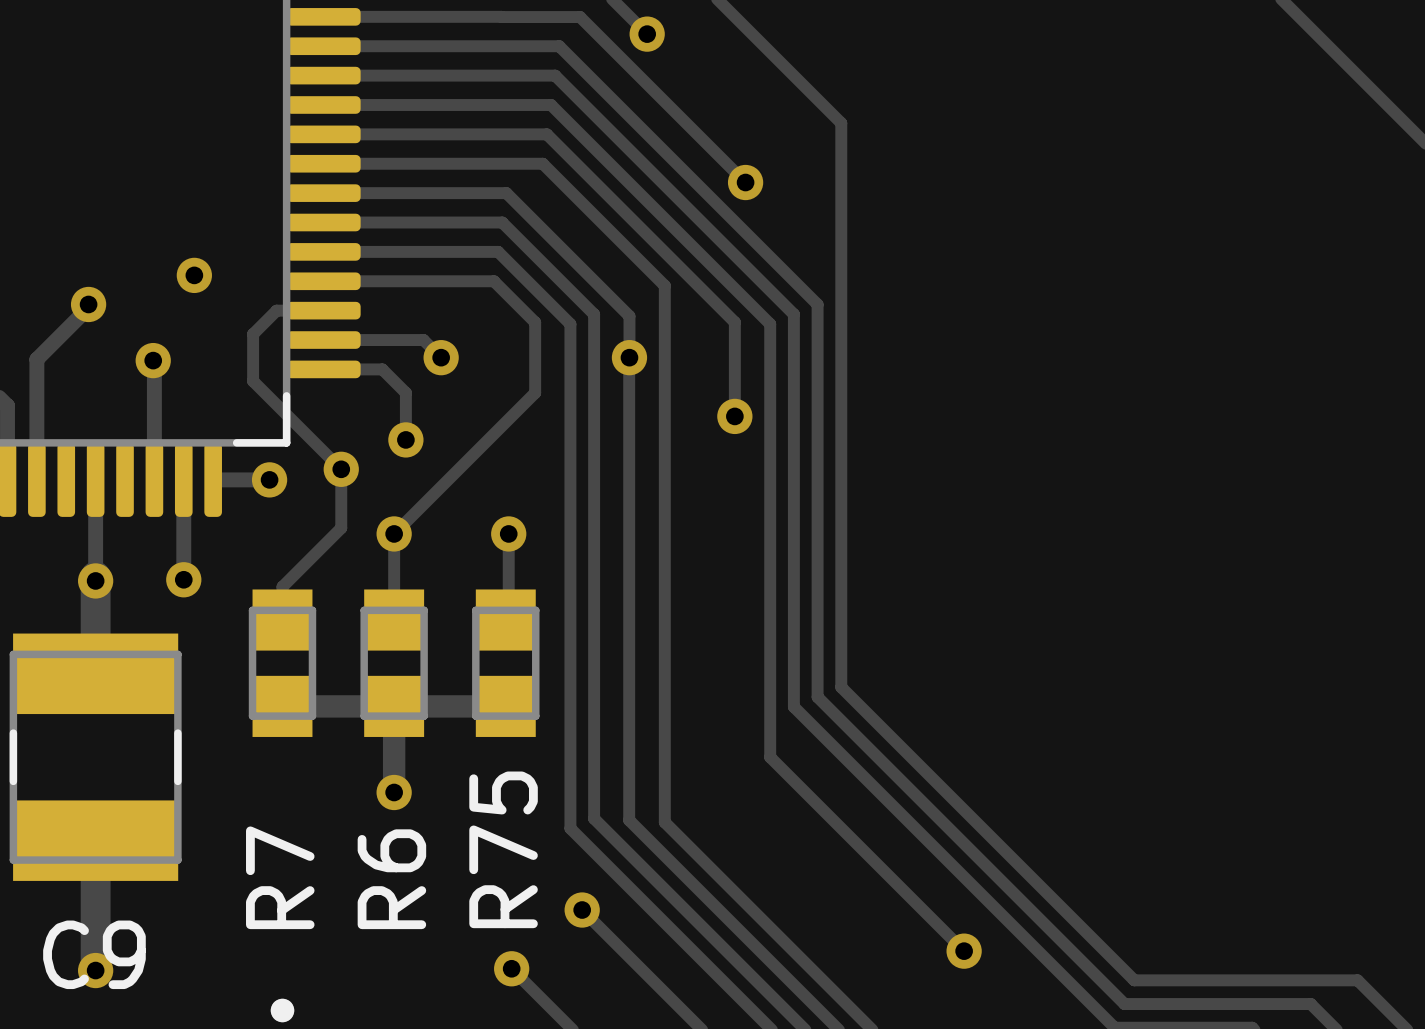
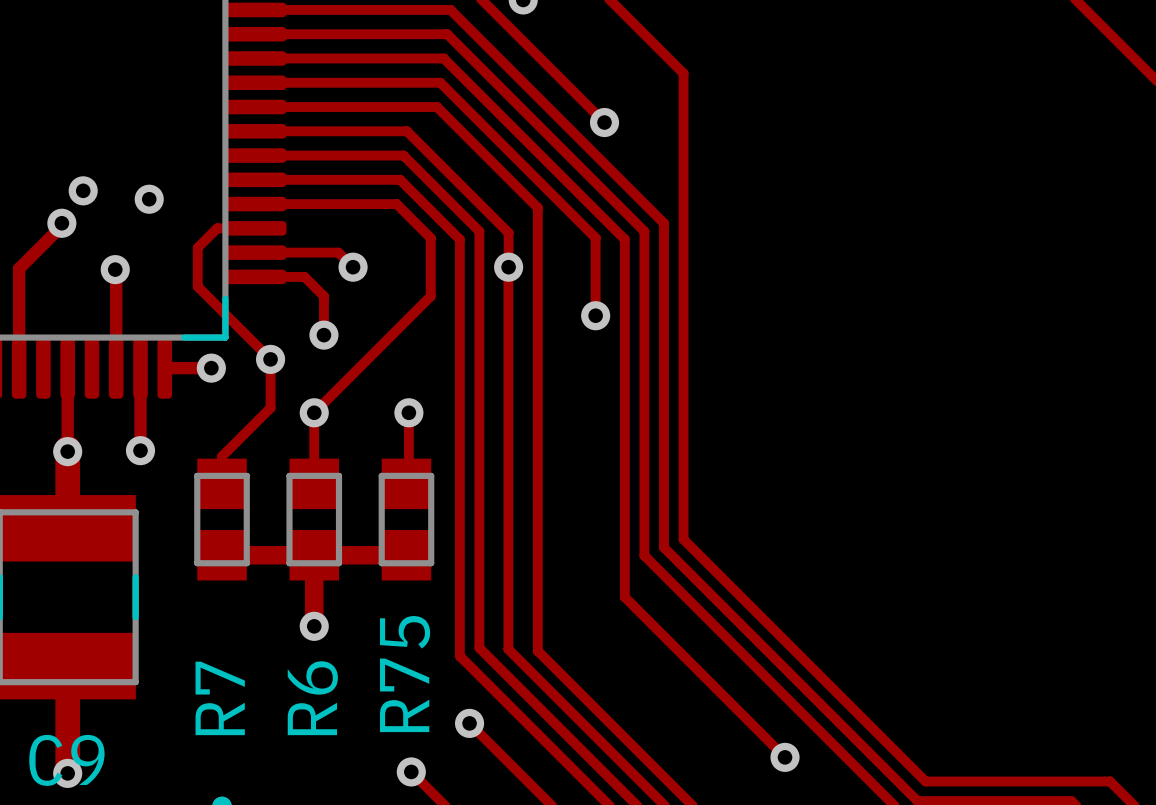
via: none -> (83, 190)

